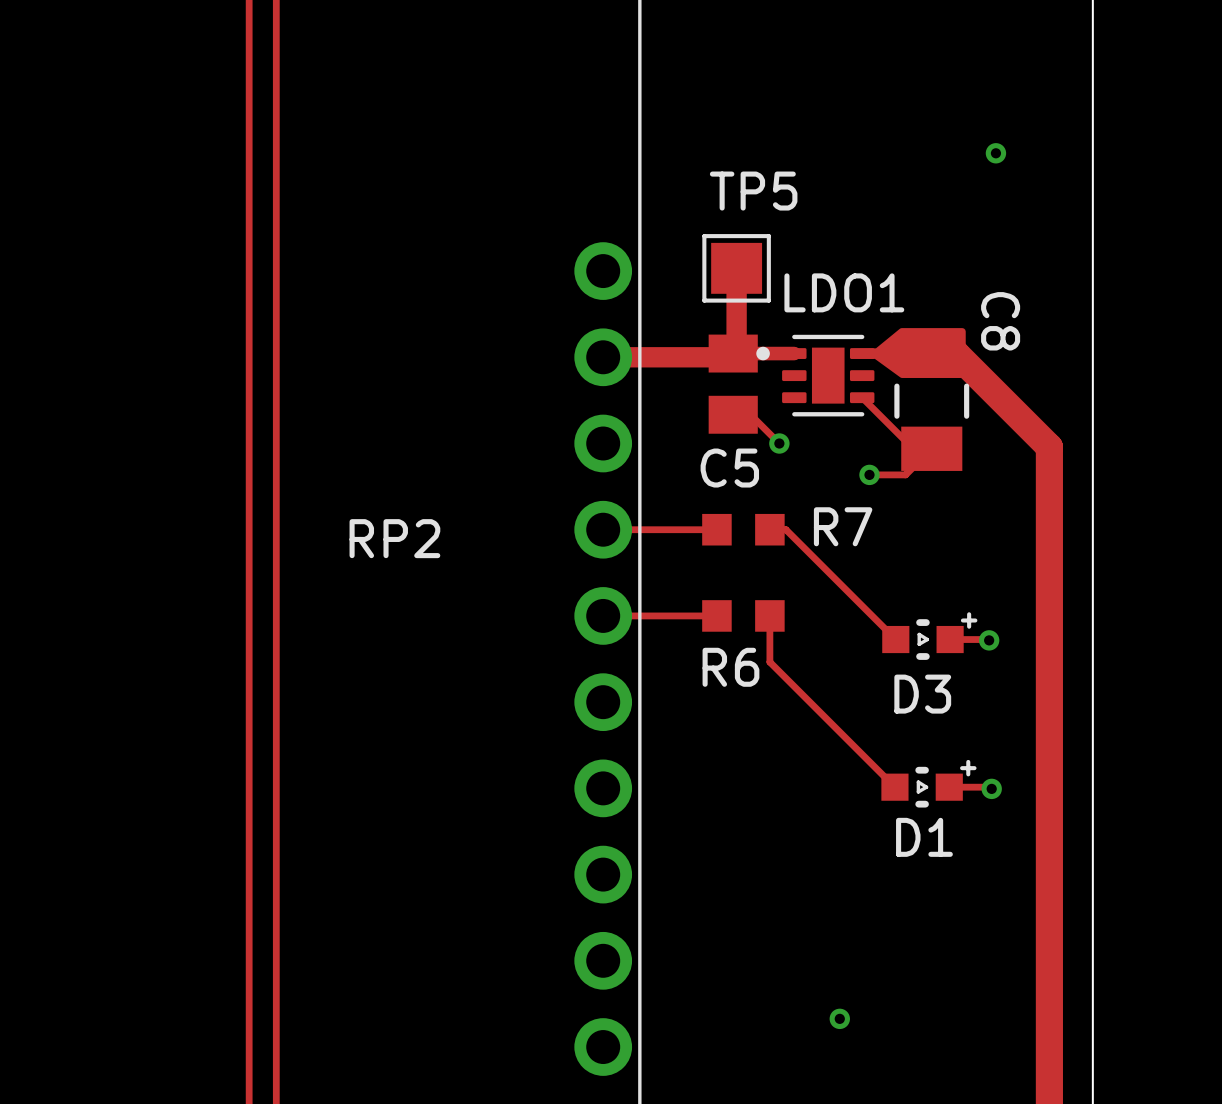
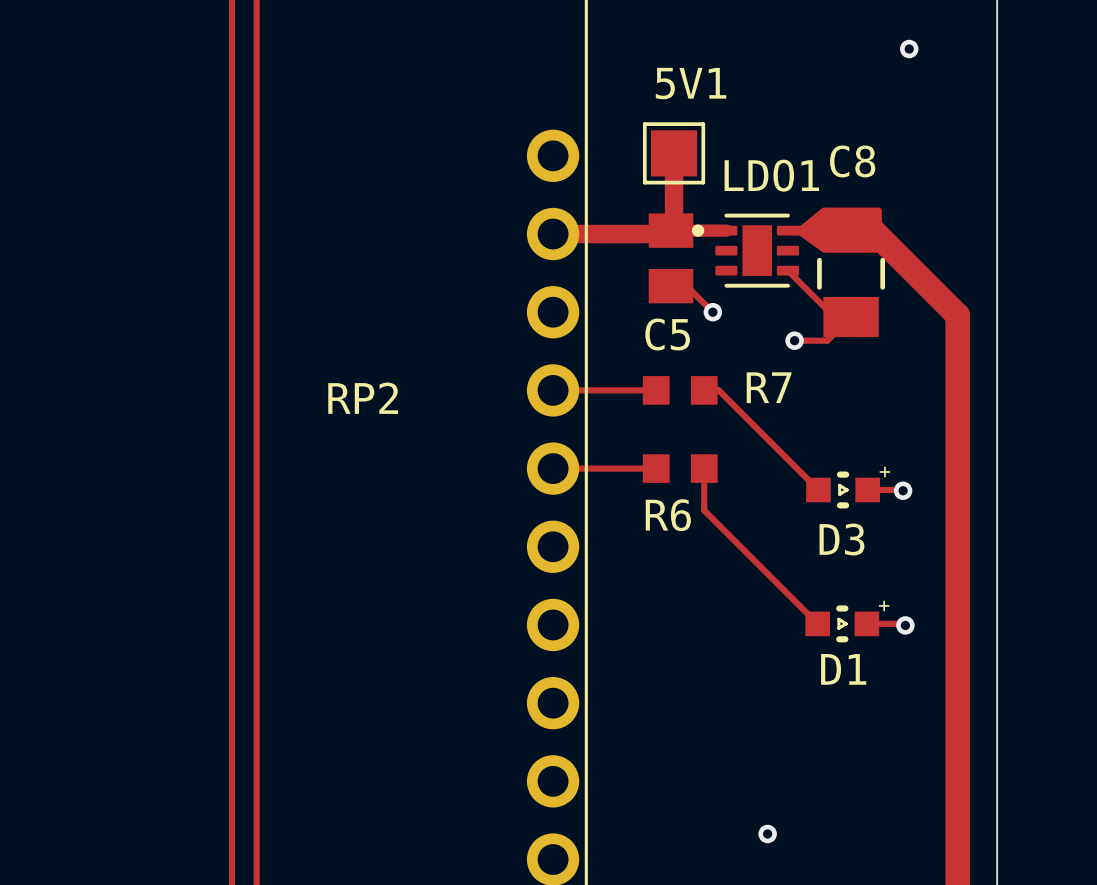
TP5 name: TP5 (753, 191) -> 5V1 (691, 83)
C8 name rotation: 0° (1000, 321) -> 90° counterclockwise (852, 161)

